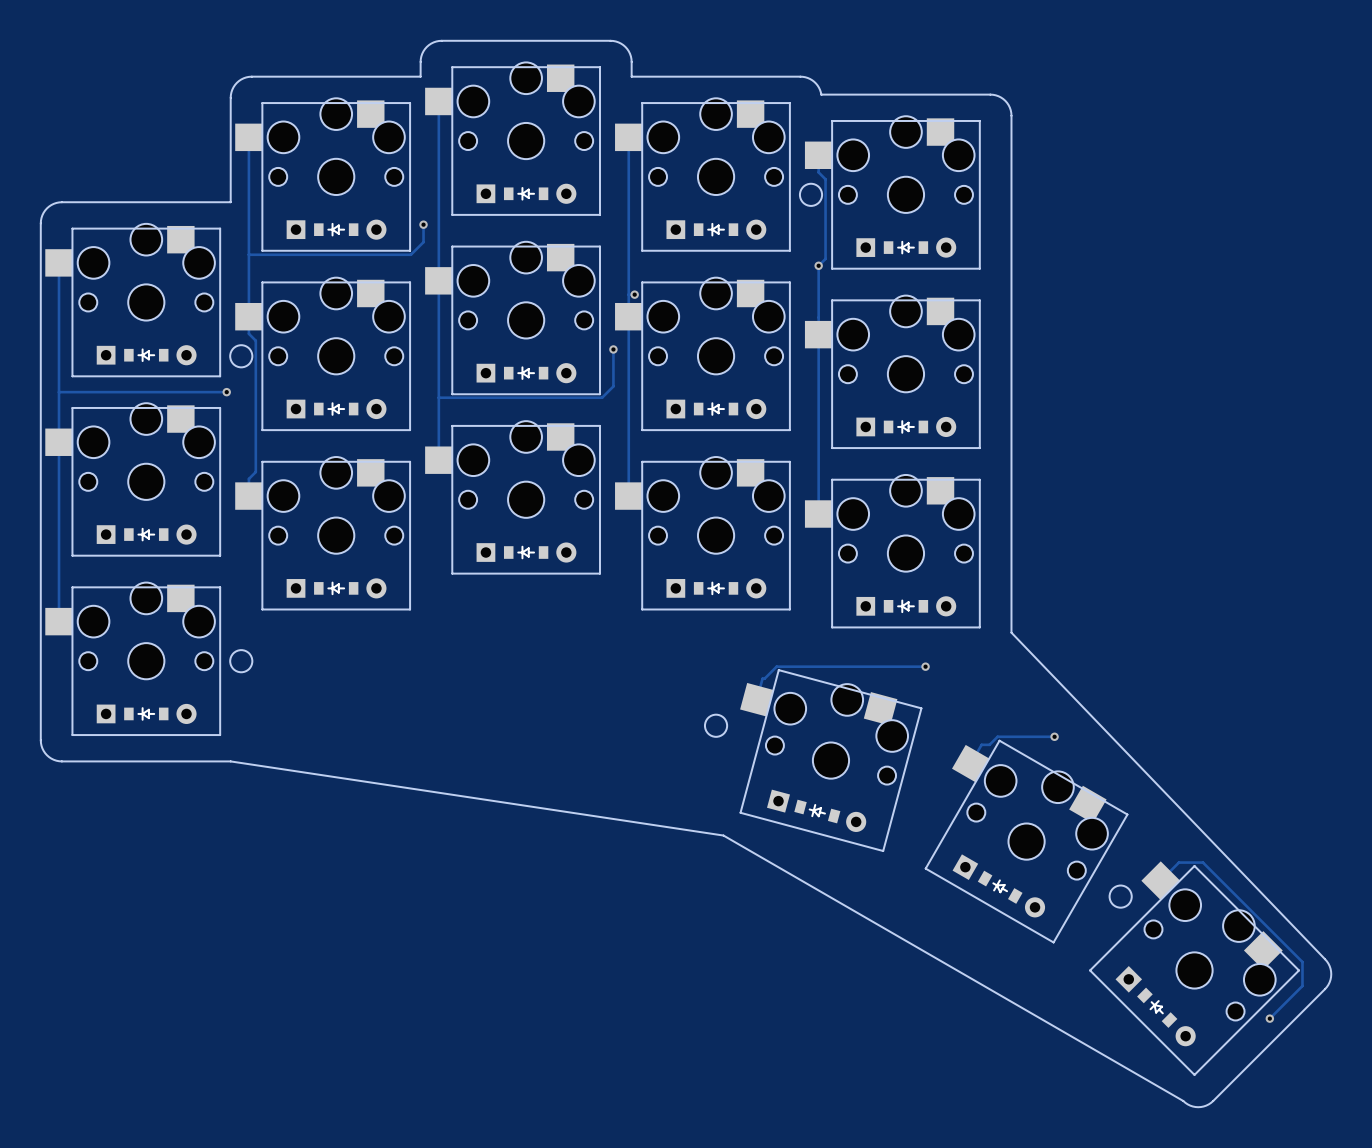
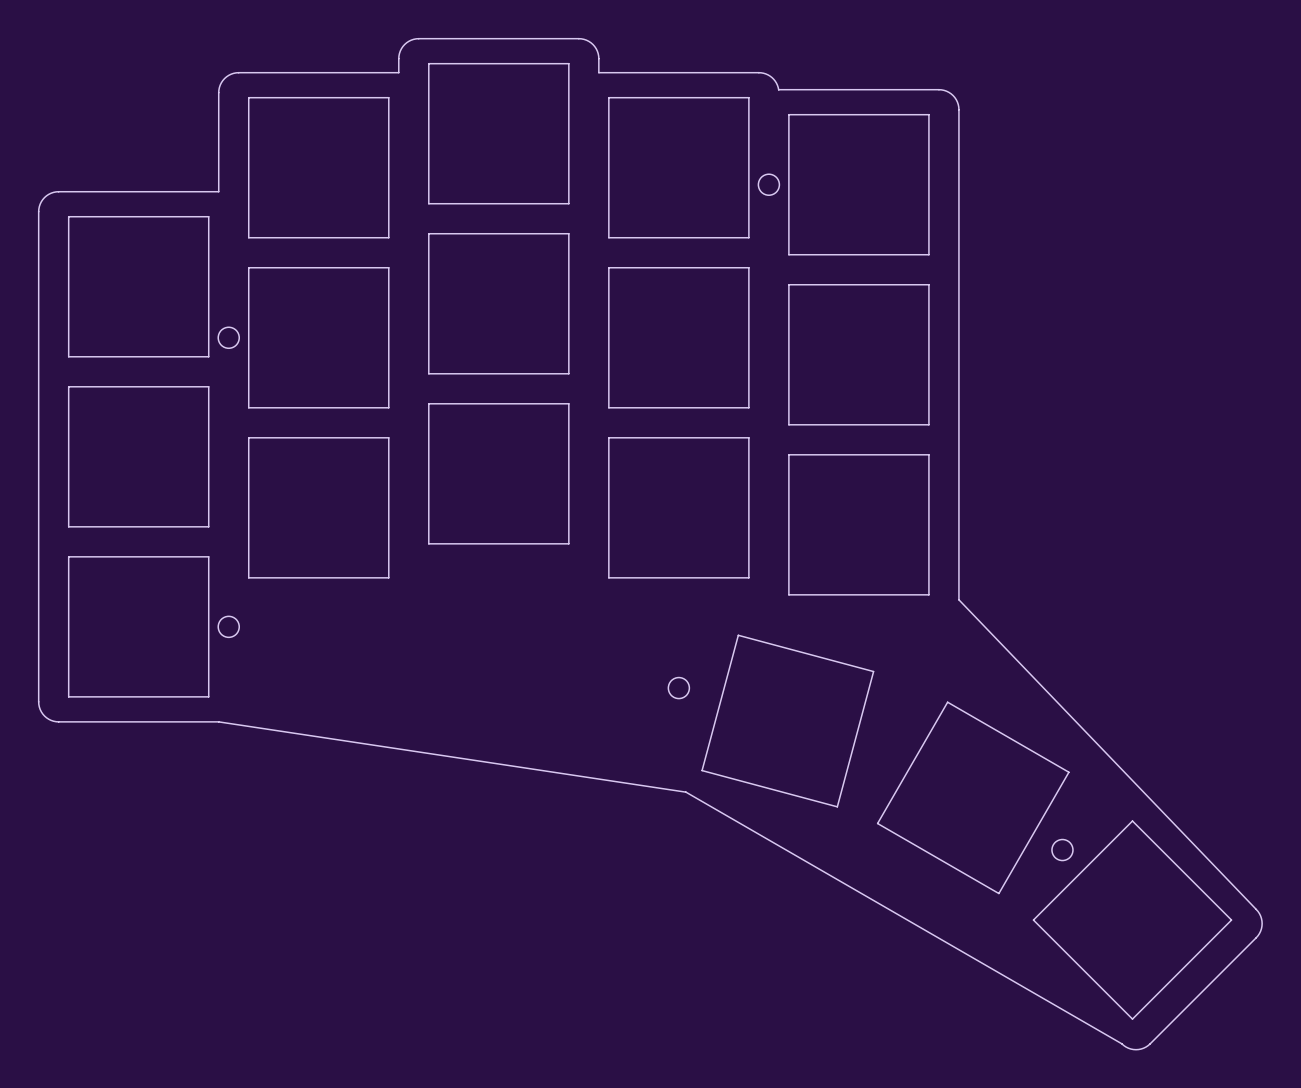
track: (438, 101) (438, 460) -> none
part: (509, 110) -> none
track: (248, 137) (248, 333) (255, 340) (255, 472) (248, 478) (248, 496) -> none
track: (628, 137) (628, 496) -> none
part: (320, 146) -> none
part: (699, 146) -> none
track: (818, 155) (818, 172) (825, 179) (825, 258) (818, 265) (818, 514) -> none
part: (889, 164) -> none
part: (526, 193) -> none
track: (423, 224) (423, 242) (410, 254) (248, 254) -> none
via: (423, 224) -> none
part: (336, 229) -> none
part: (716, 229) -> none
part: (906, 247) -> none
track: (59, 262) (59, 621) -> none
via: (818, 265) -> none
part: (130, 272) -> none
part: (509, 290) -> none
via: (634, 294) -> none
part: (320, 326) -> none
part: (699, 326) -> none
part: (889, 343) -> none
track: (613, 349) (613, 386) (602, 397) (438, 397) -> none
via: (613, 349) -> none
part: (146, 355) -> none
part: (526, 373) -> none
track: (59, 392) (226, 392) -> none
via: (226, 392) -> none
part: (336, 409) -> none
part: (716, 409) -> none
part: (906, 426) -> none
part: (130, 451) -> none
part: (509, 469) -> none
part: (320, 505) -> none
part: (699, 505) -> none
part: (889, 523) -> none
part: (146, 534) -> none
part: (526, 552) -> none
part: (336, 588) -> none
part: (716, 588) -> none
part: (906, 606) -> none
part: (130, 630) -> none
track: (925, 666) (776, 666) (762, 678) (756, 699) -> none
via: (925, 666) -> none
part: (146, 713) -> none
part: (824, 733) -> none
track: (1054, 736) (997, 736) (989, 744) (981, 744) (970, 763) -> none
via: (1054, 736) -> none
part: (816, 810) -> none
part: (1029, 812) -> none
track: (1160, 880) (1178, 862) (1202, 862) (1302, 962) (1302, 985) (1269, 1018) -> none
part: (998, 885) -> none
part: (1212, 940) -> none
part: (1155, 1006) -> none
via: (1269, 1018) -> none

